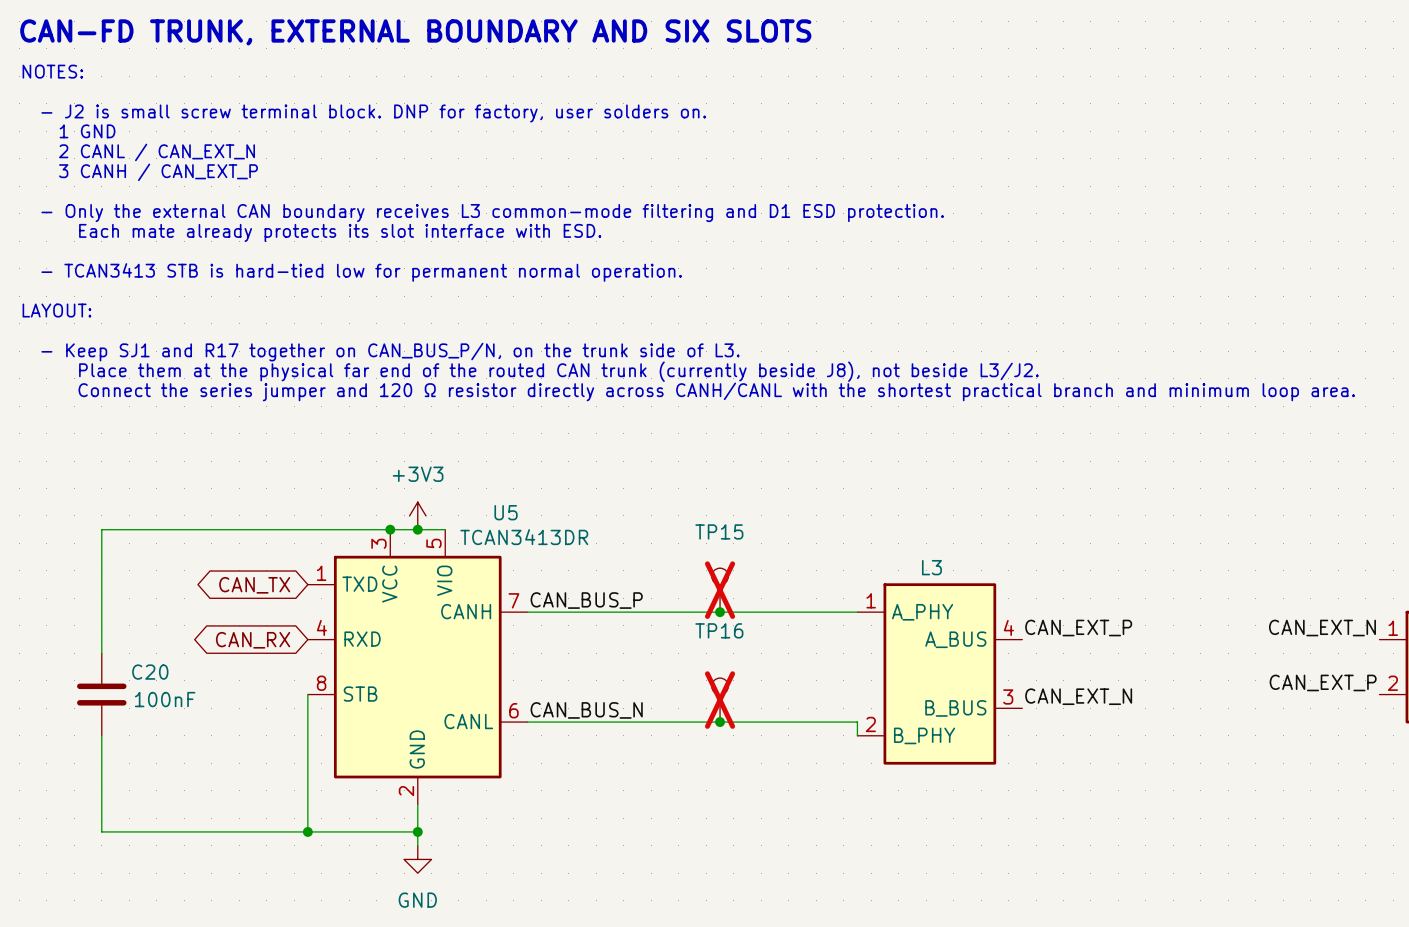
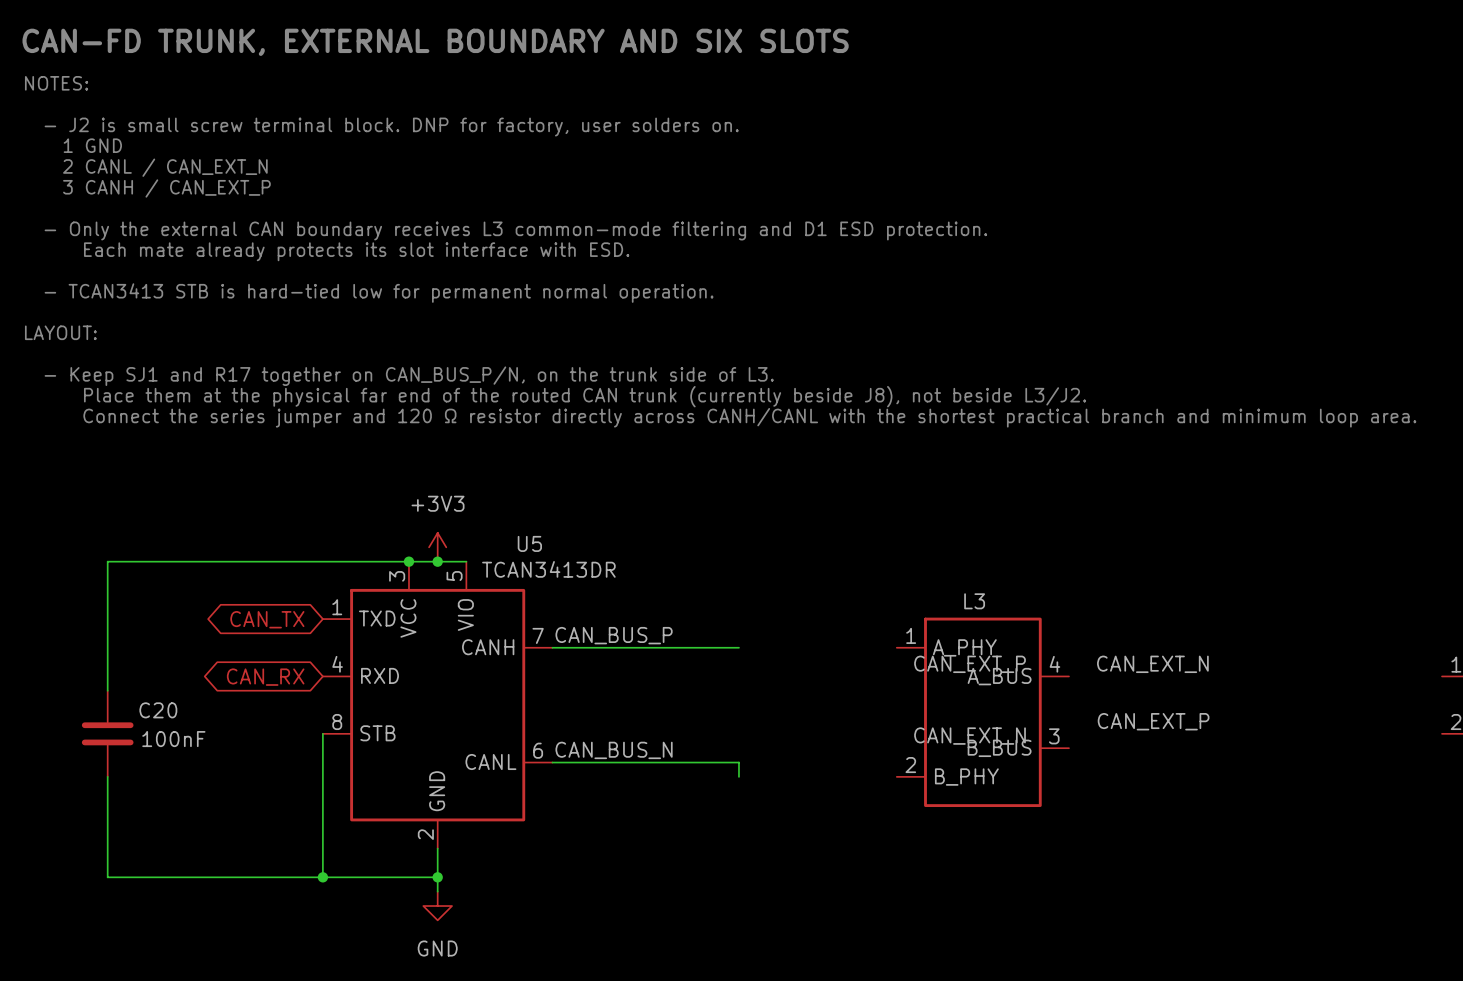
TP15: (720, 590) -> none
wire: (706, 612) (857, 612) -> none
junction: (720, 612) -> none
label: none -> CAN_EXT_P (970, 664)
label: CAN_EXT_P (1078, 628) -> CAN_EXT_N (1152, 664)
label: CAN_EXT_N (1322, 628) -> none
label: CAN_EXT_P (1323, 682) -> none
label: none -> CAN_EXT_N (970, 736)
label: CAN_EXT_N (1078, 696) -> CAN_EXT_P (1153, 721)
TP16: (720, 700) -> none
wire: (706, 722) (857, 722) (857, 735) -> (738, 762) (738, 776)
junction: (720, 722) -> none

